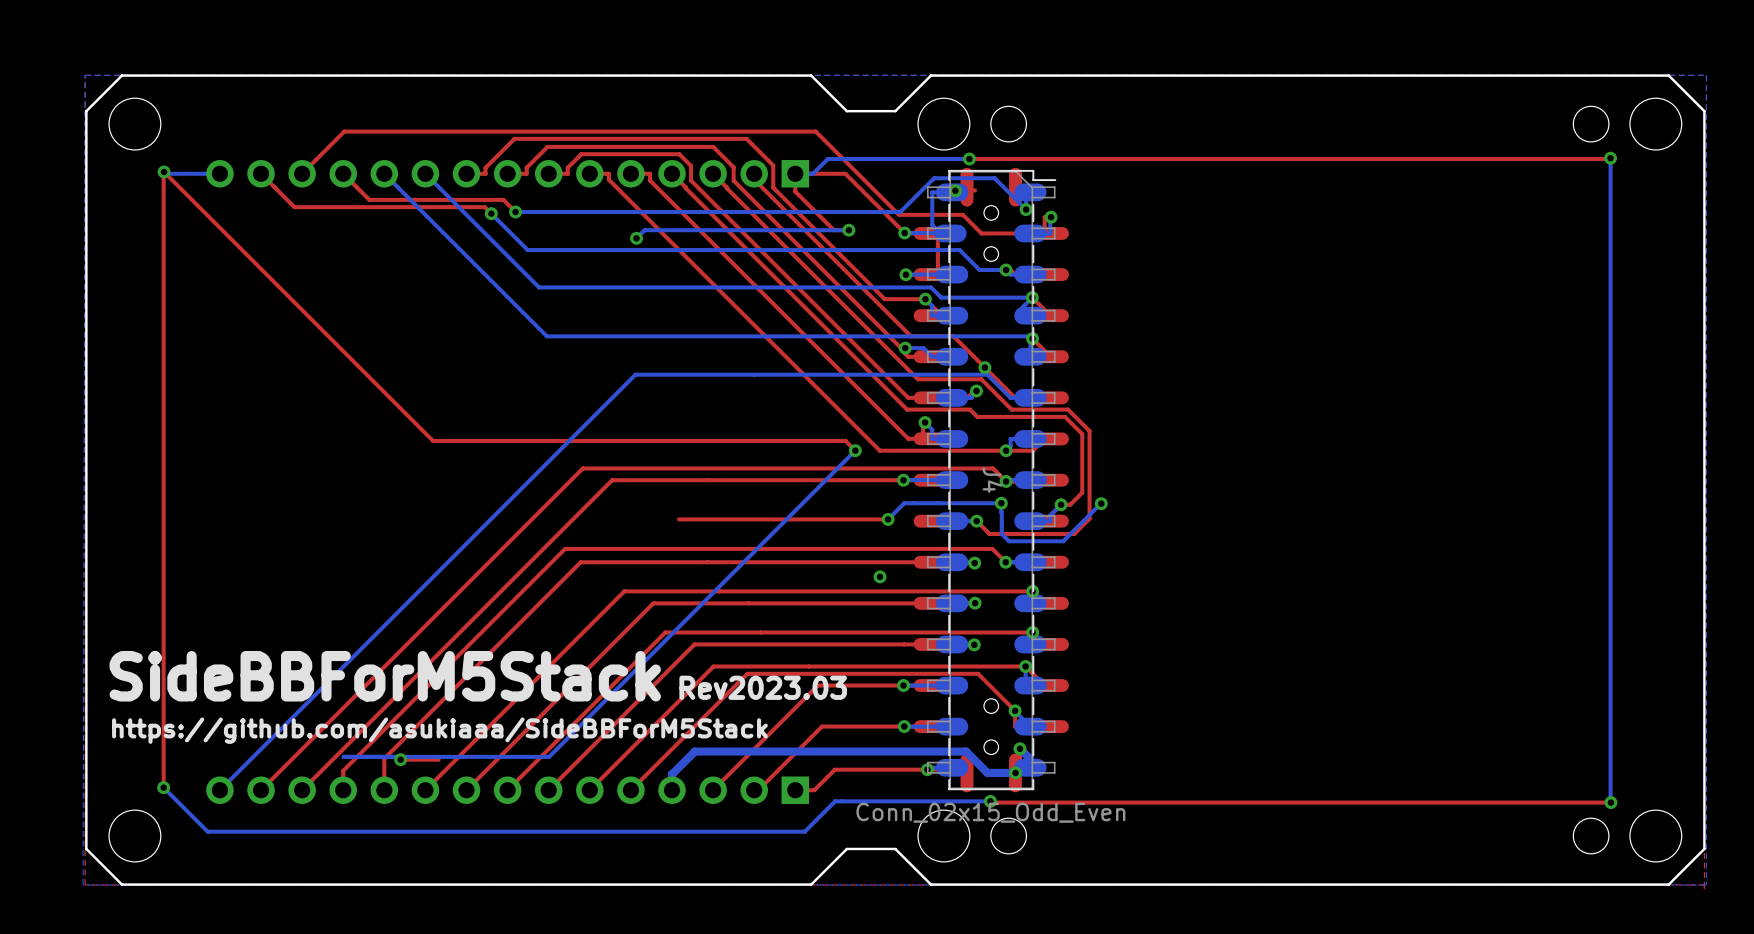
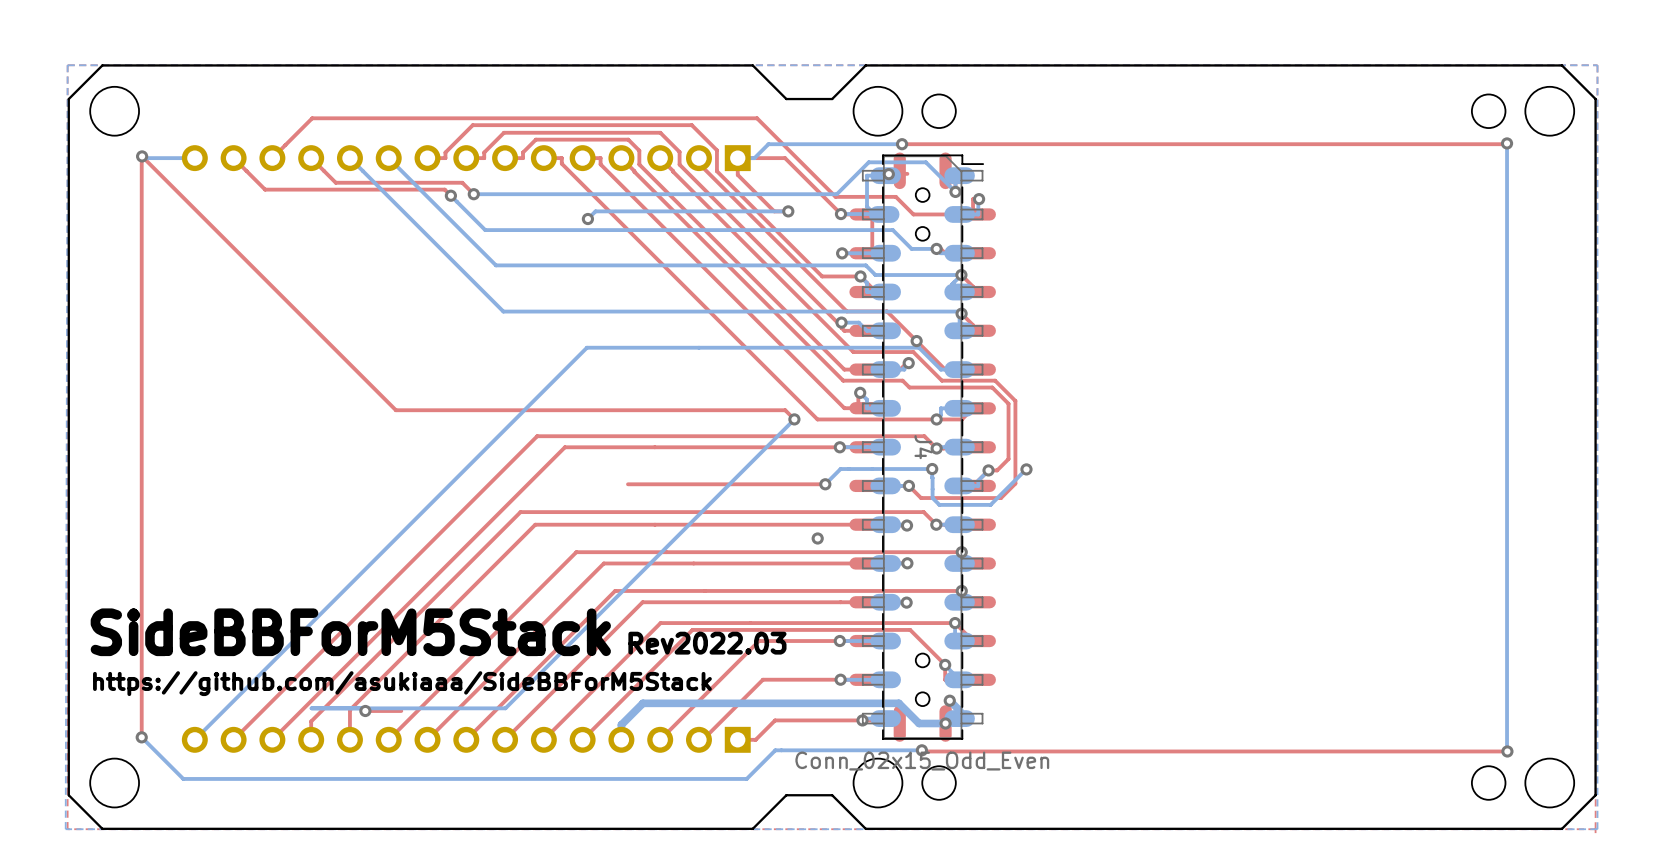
text: Rev2023.03 (763, 687) -> Rev2022.03 (707, 643)

